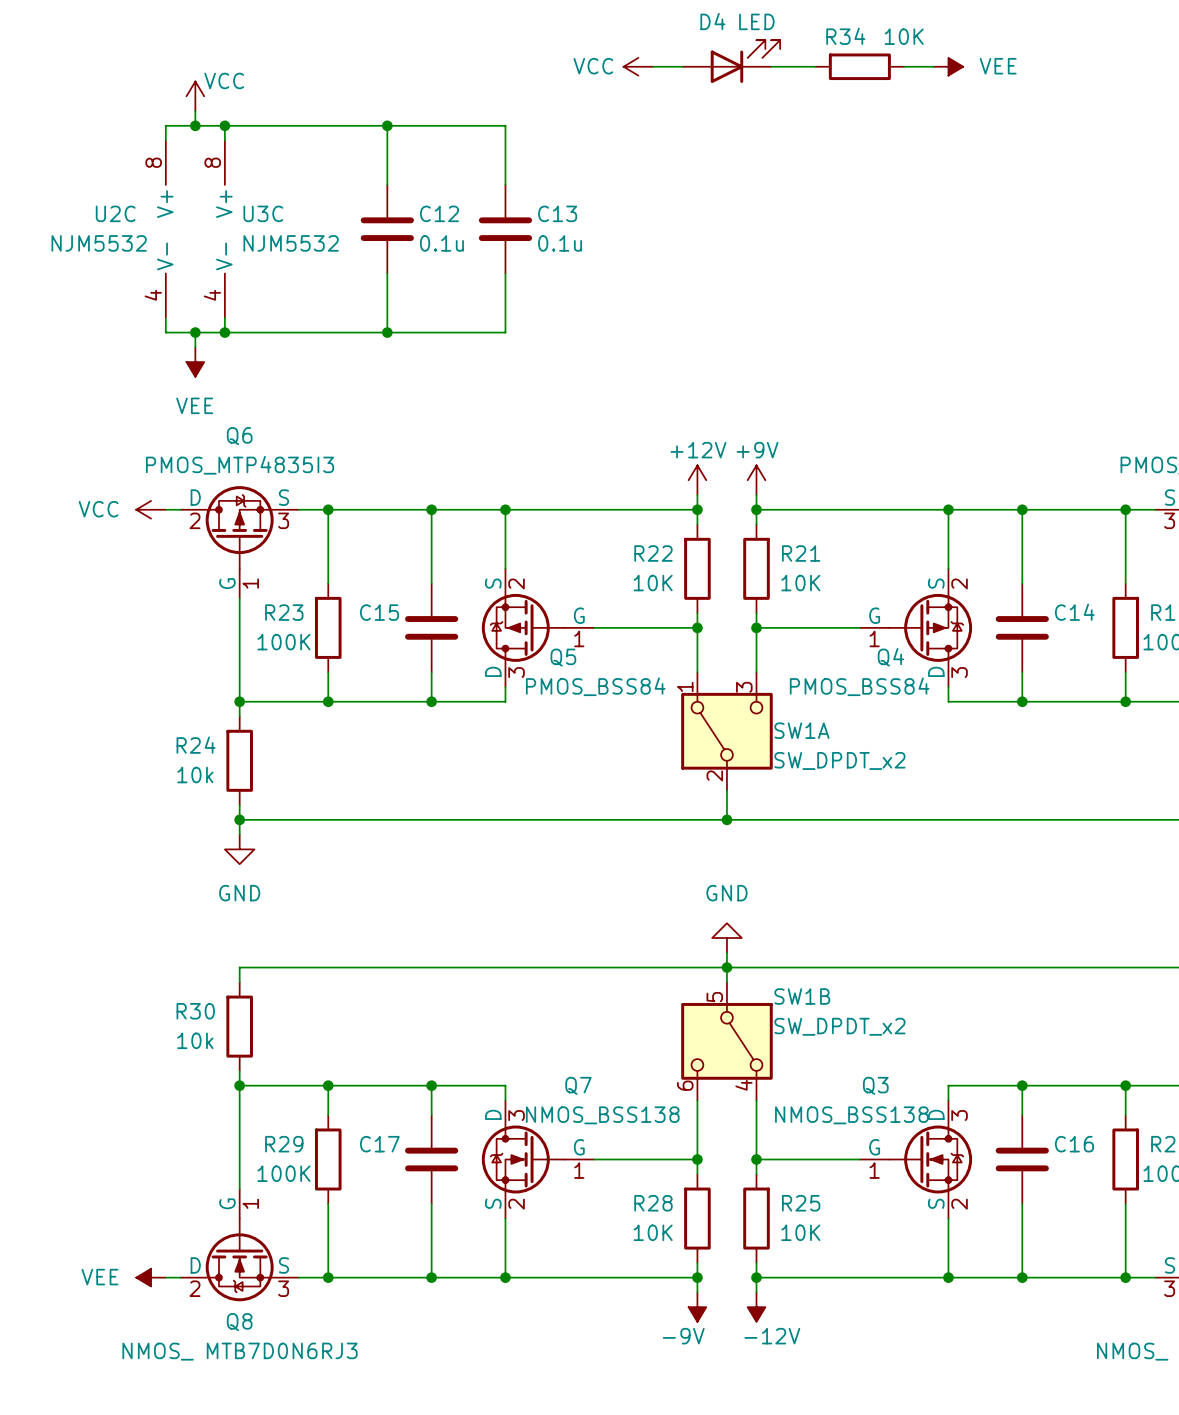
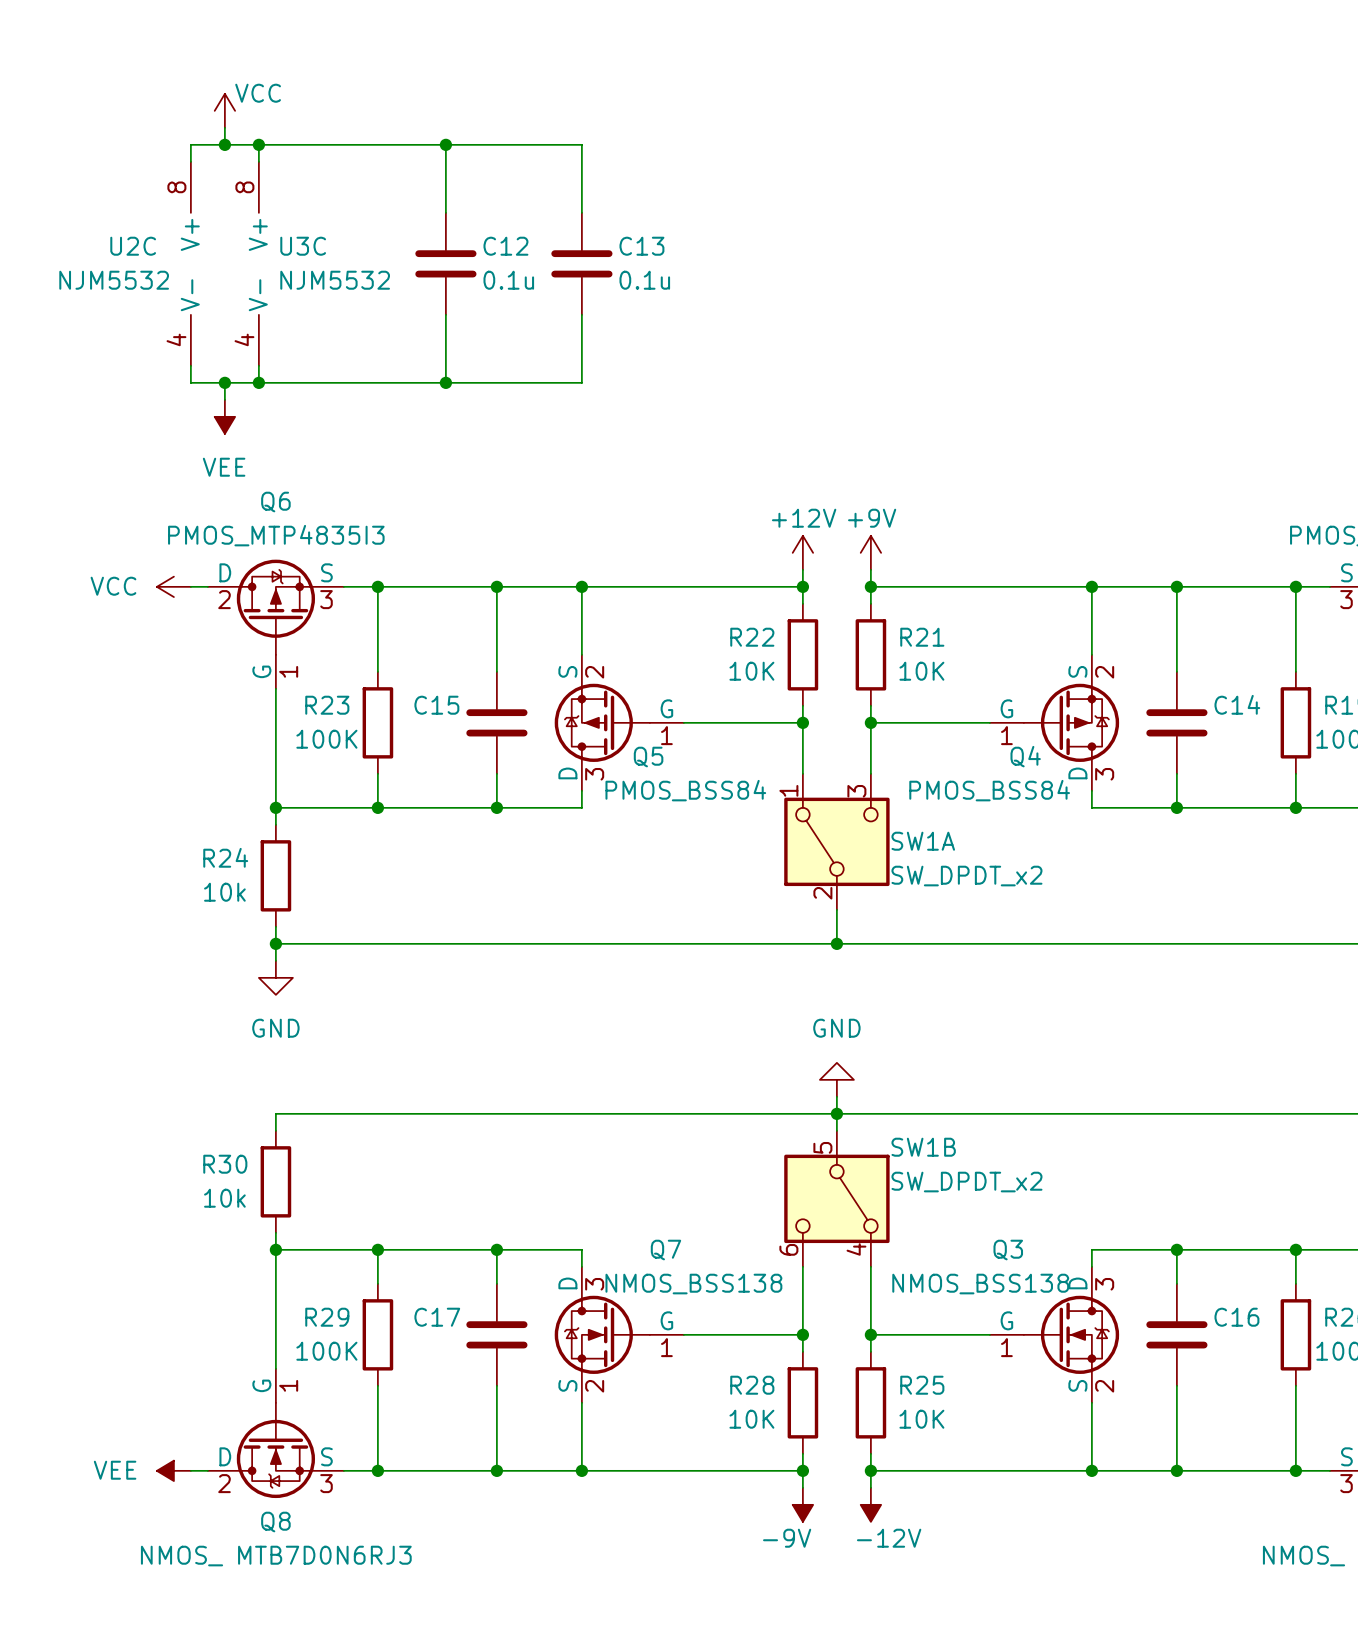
D4: LED (731, 61) -> none
power symbol: VCC (638, 66) -> none
wire: (653, 66) (682, 66) -> none
wire: (771, 66) (815, 66) -> none
R34: 10K (859, 66) -> none
wire: (904, 66) (933, 66) -> none
power symbol: VEE (948, 66) -> none

